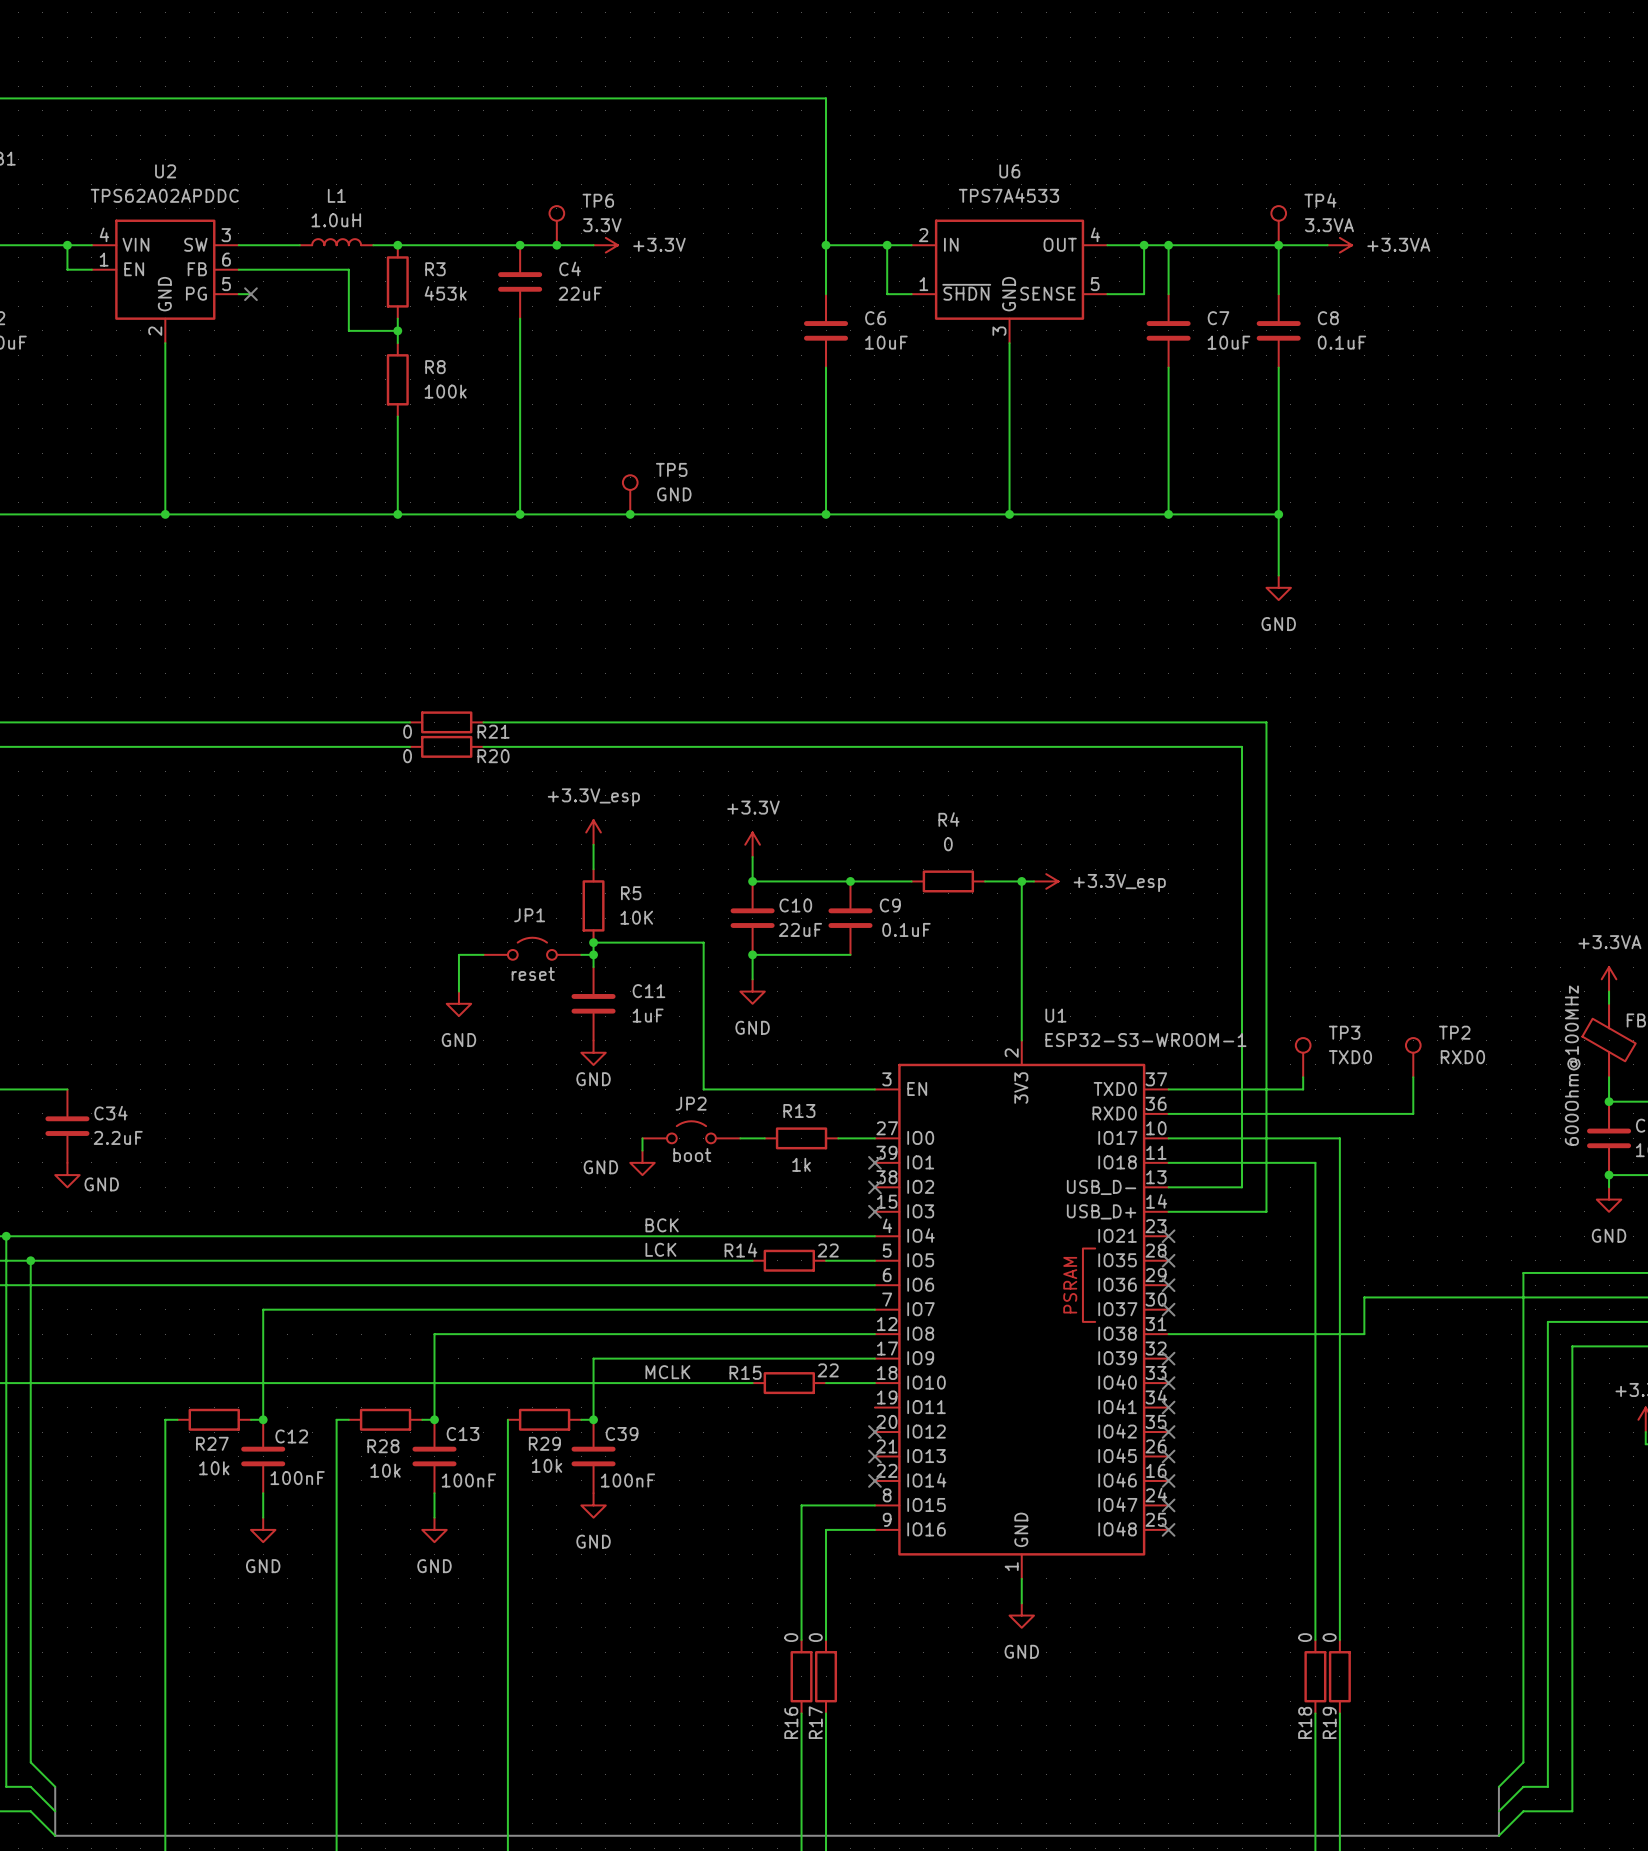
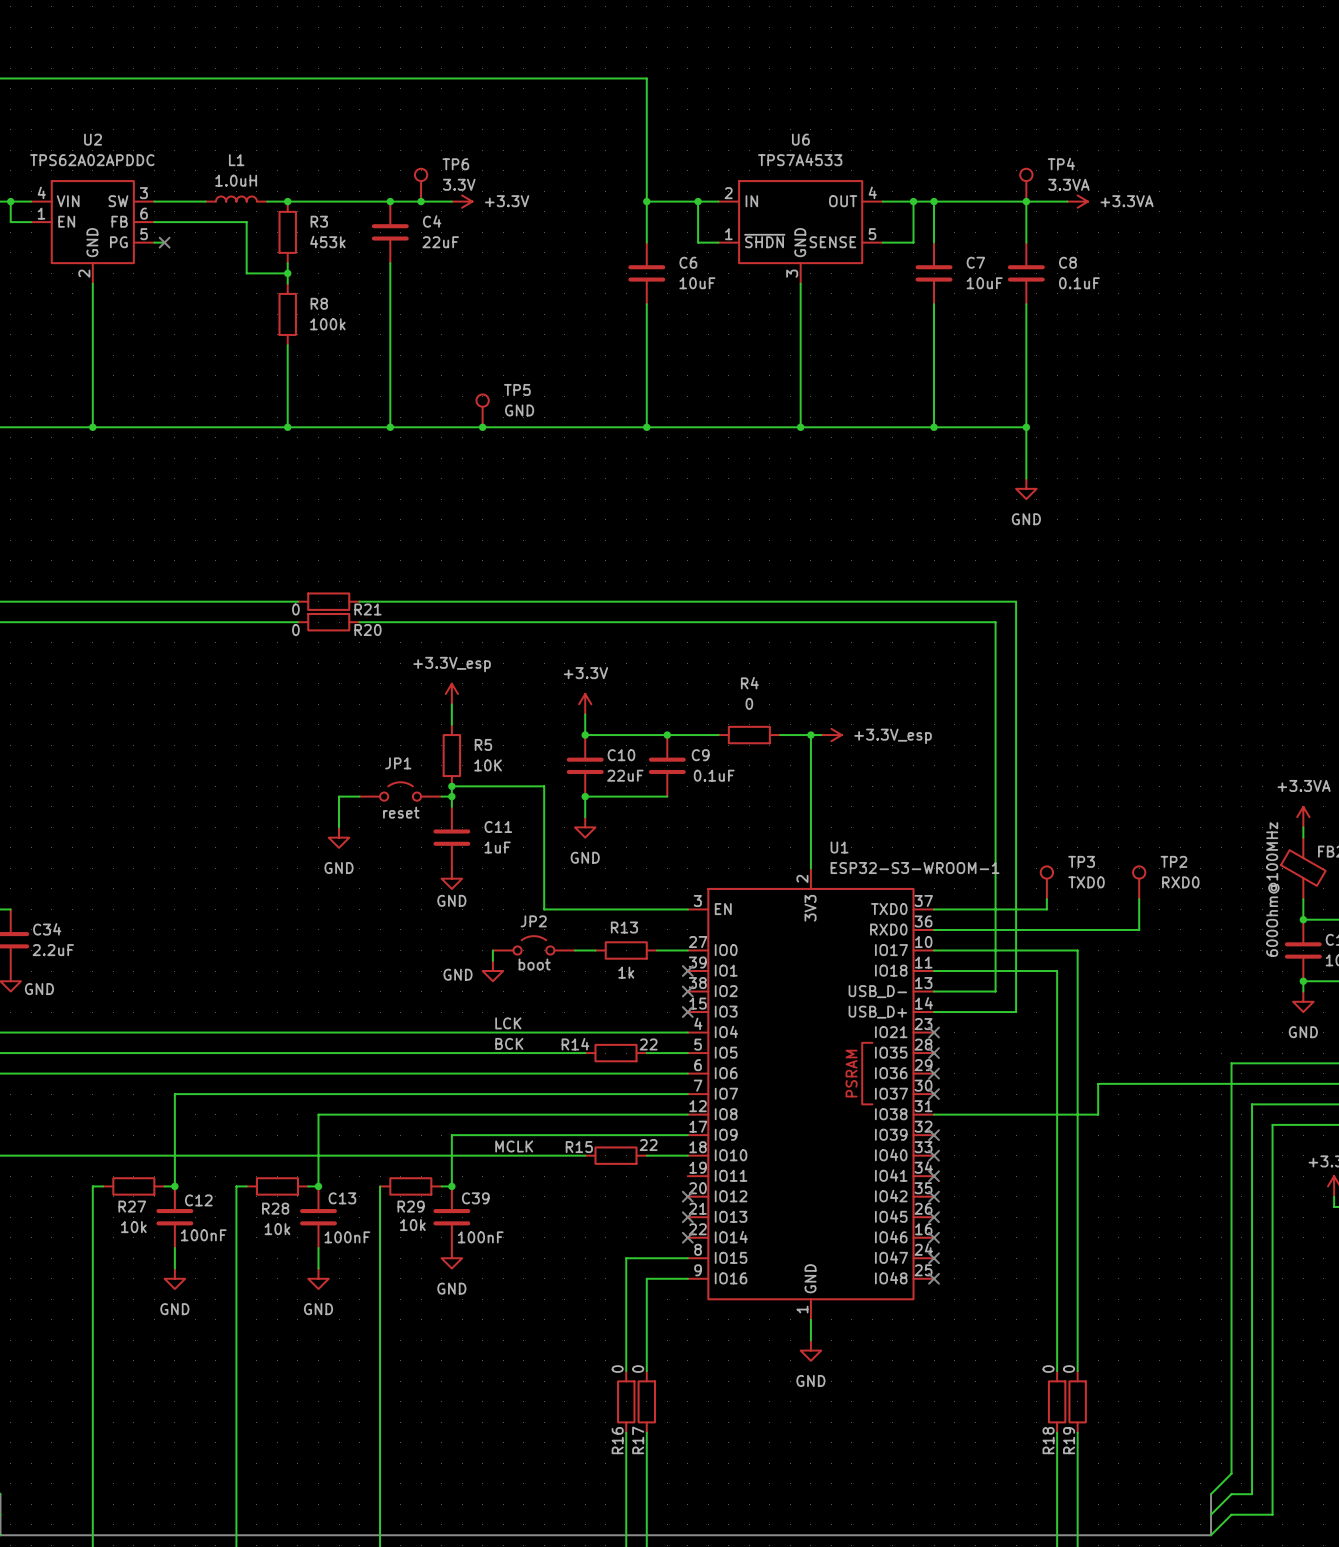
label: BCK (662, 1225) -> LCK (508, 1023)
label: LCK (660, 1249) -> BCK (509, 1043)

